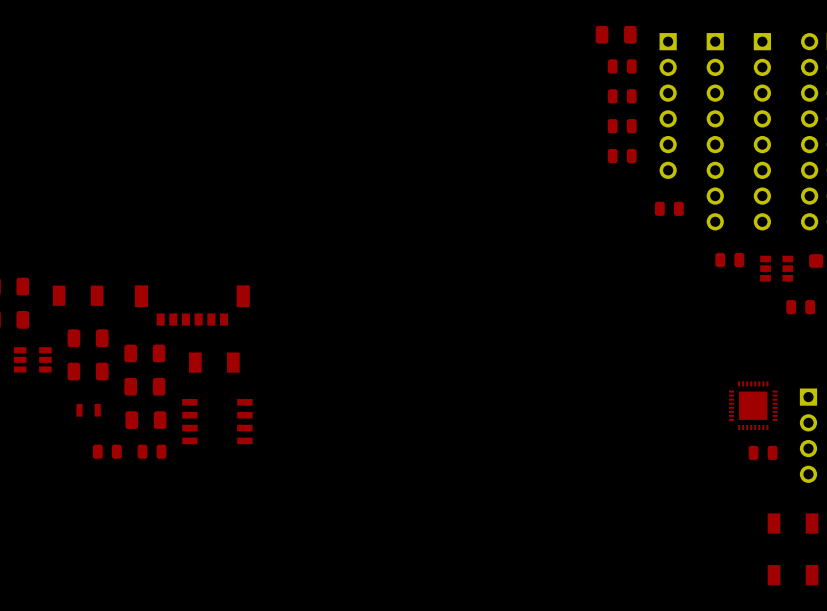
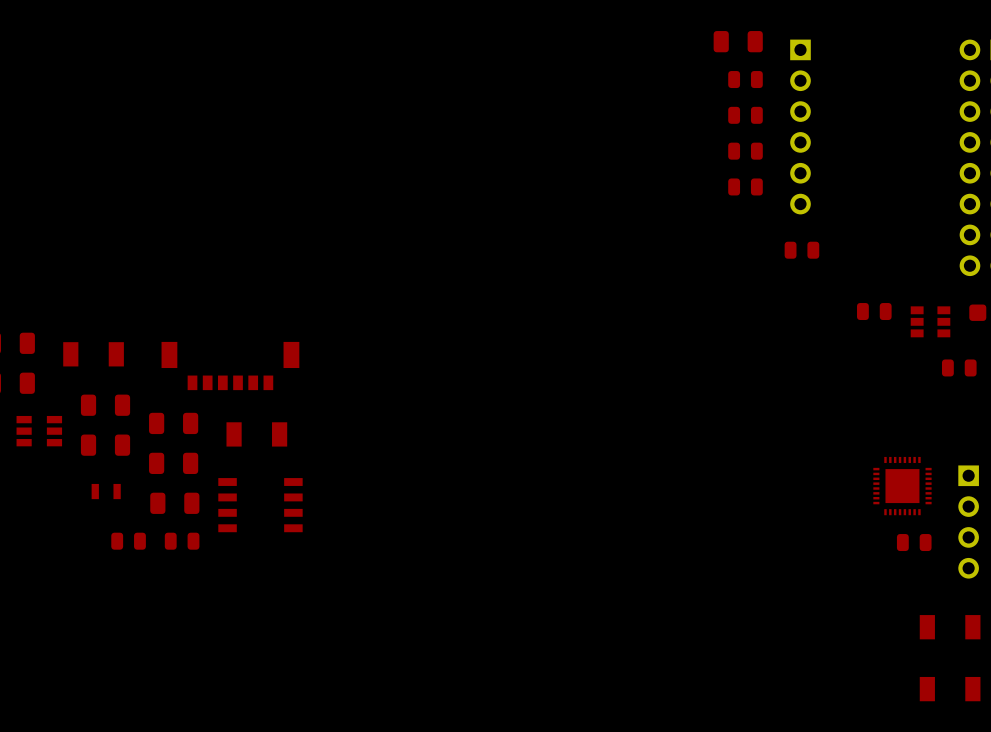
part: (715, 131) -> none
part: (762, 131) -> none

